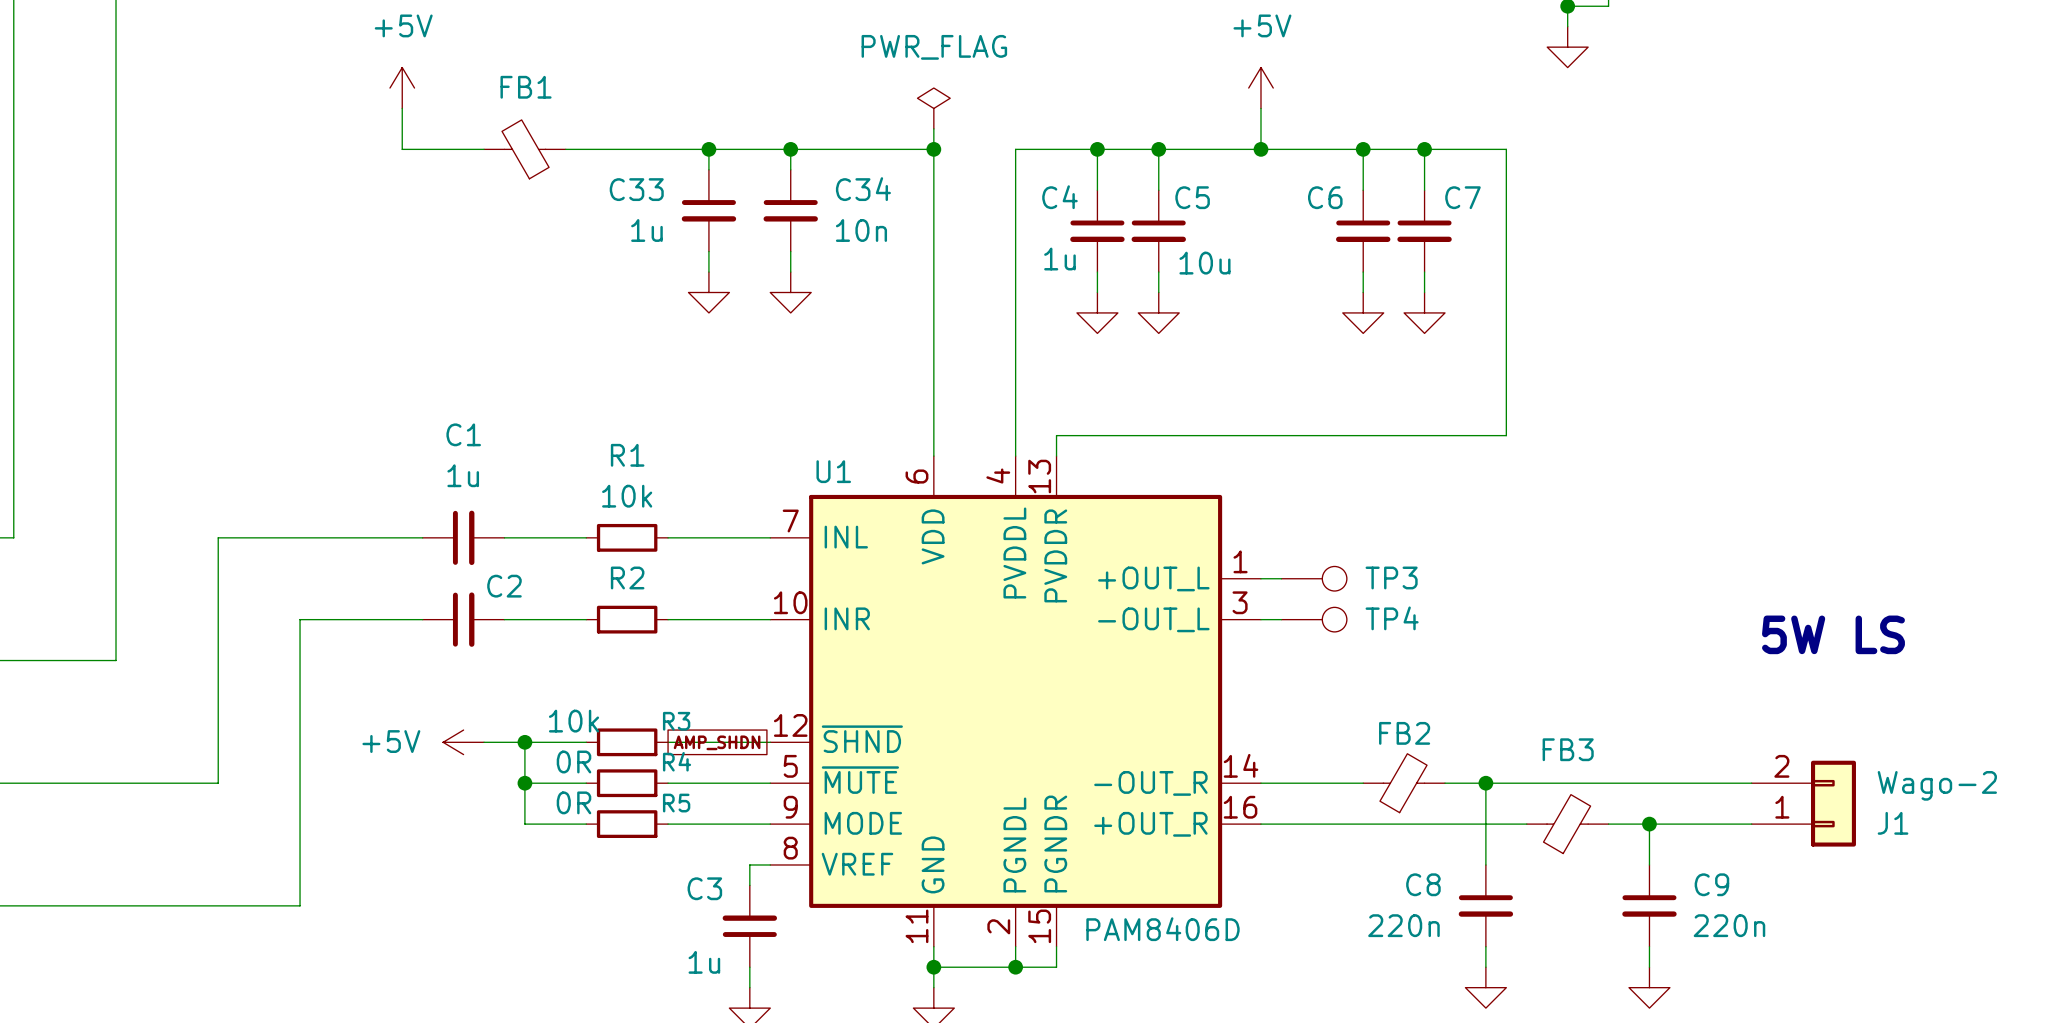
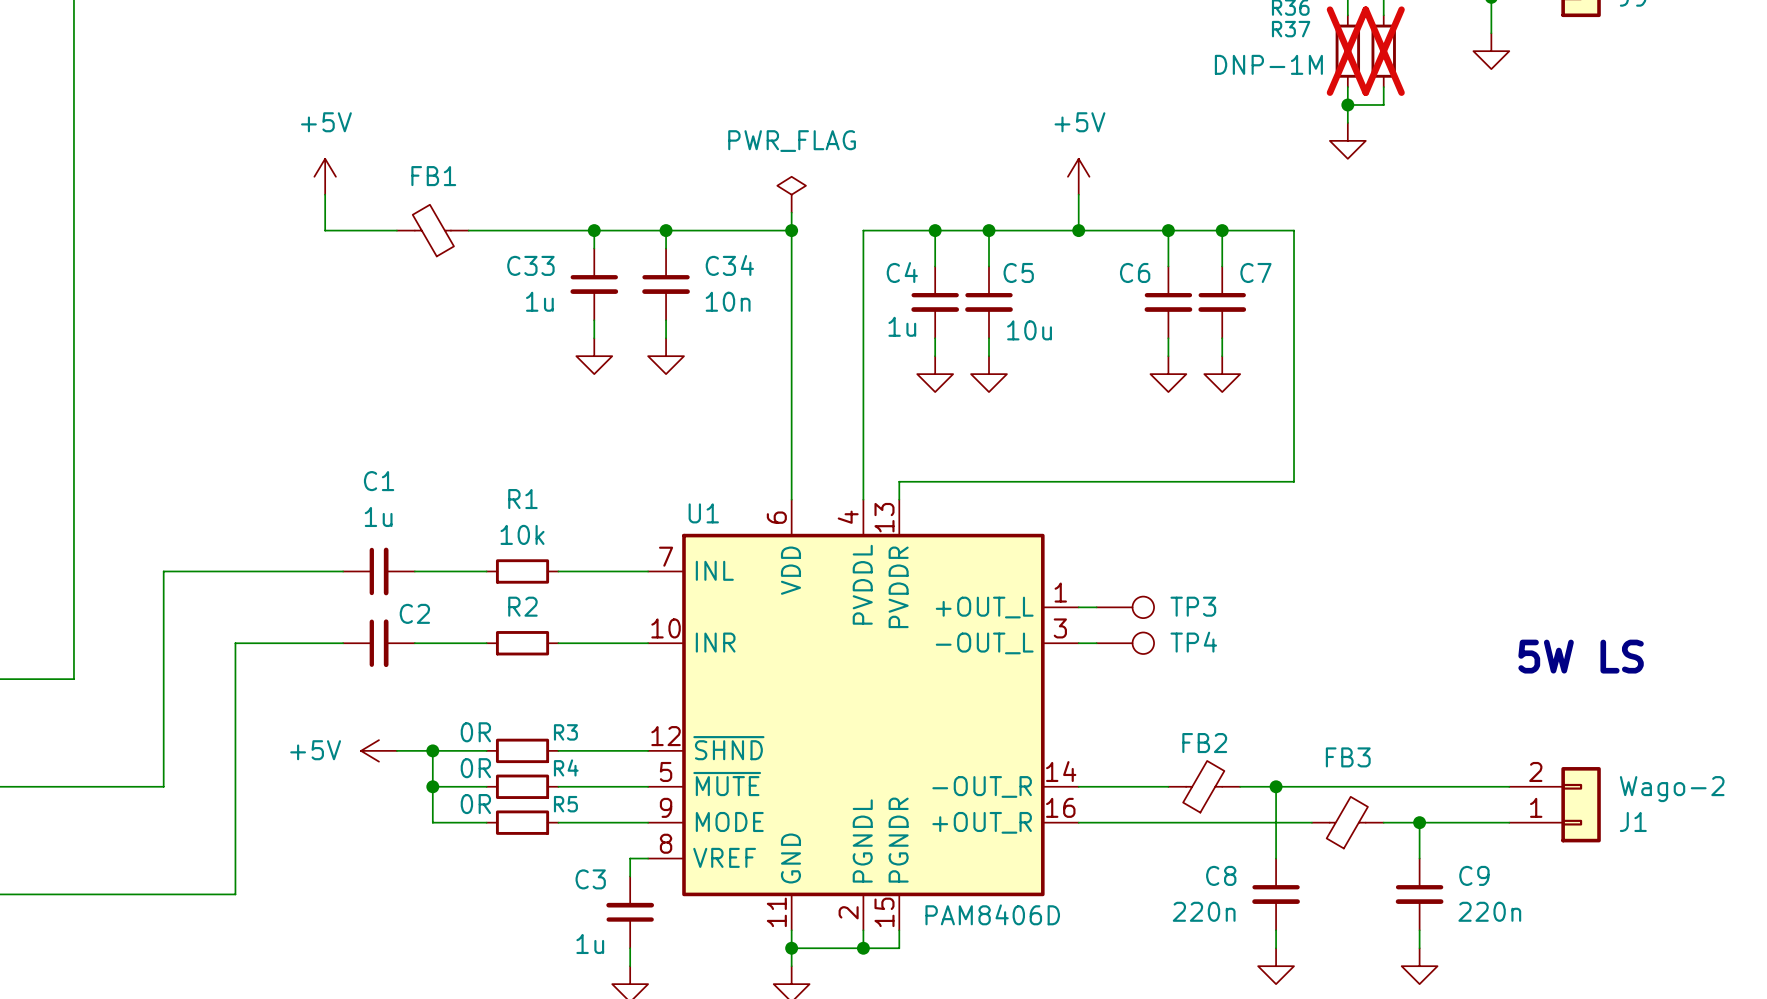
R3 value: 10k (574, 721) -> 0R (475, 732)
global label: AMP_SHDN (717, 742) -> none

